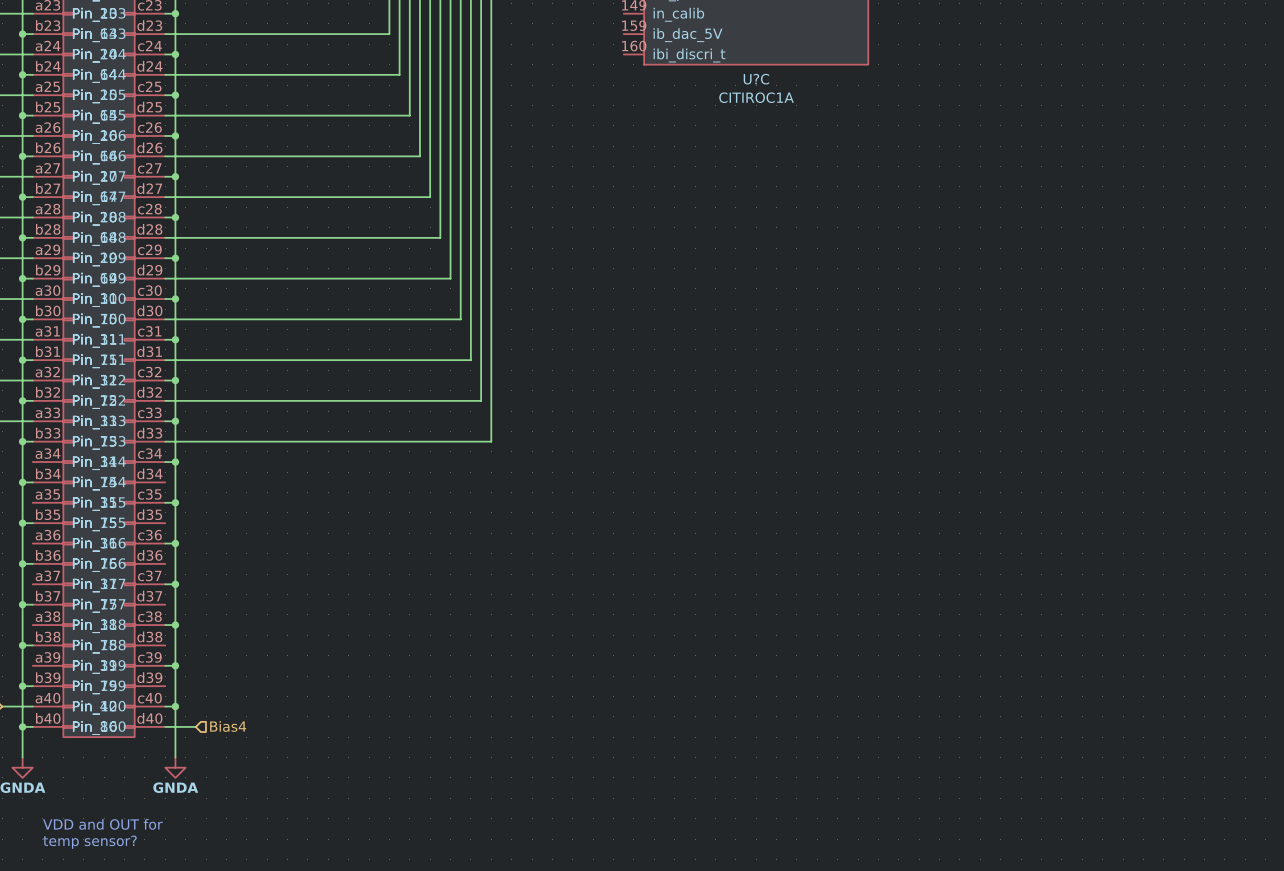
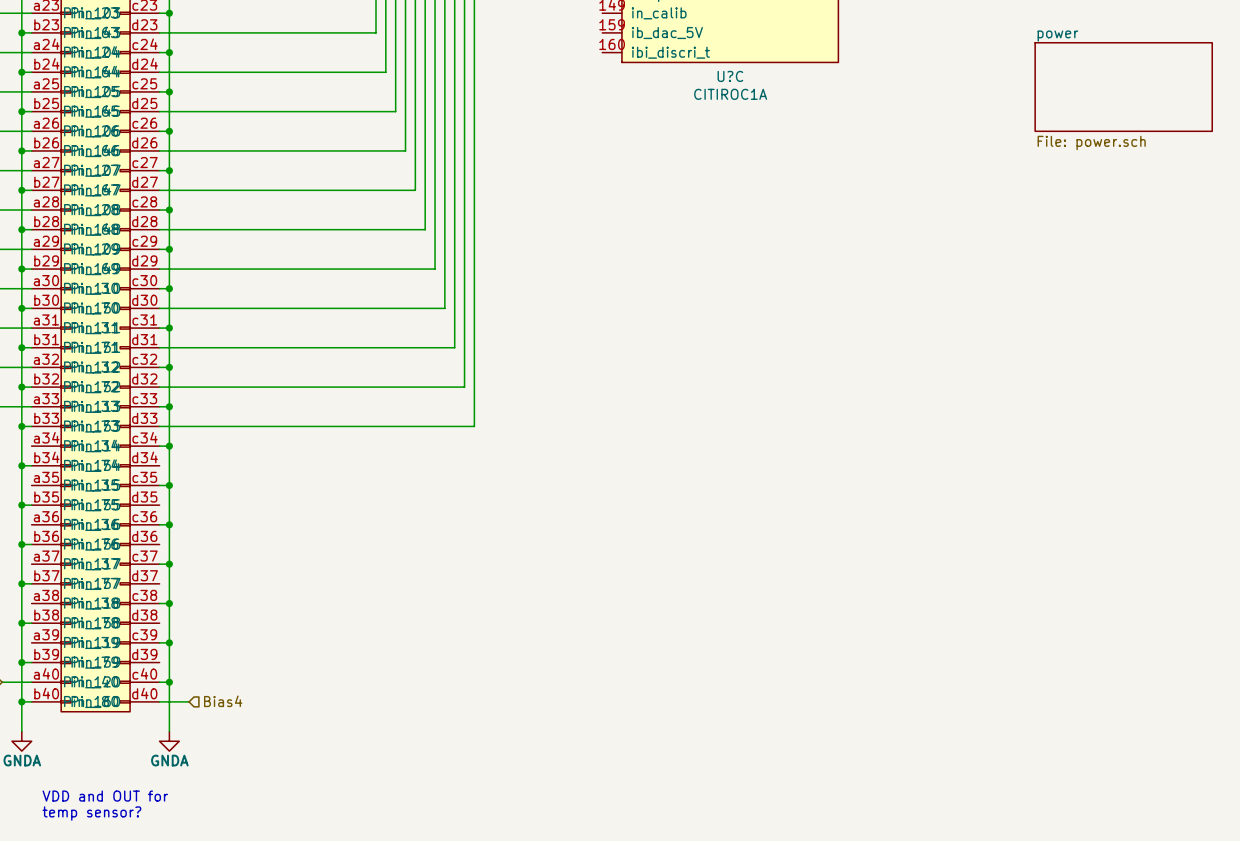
sheet power: none -> File: power.sch (1123, 87)

